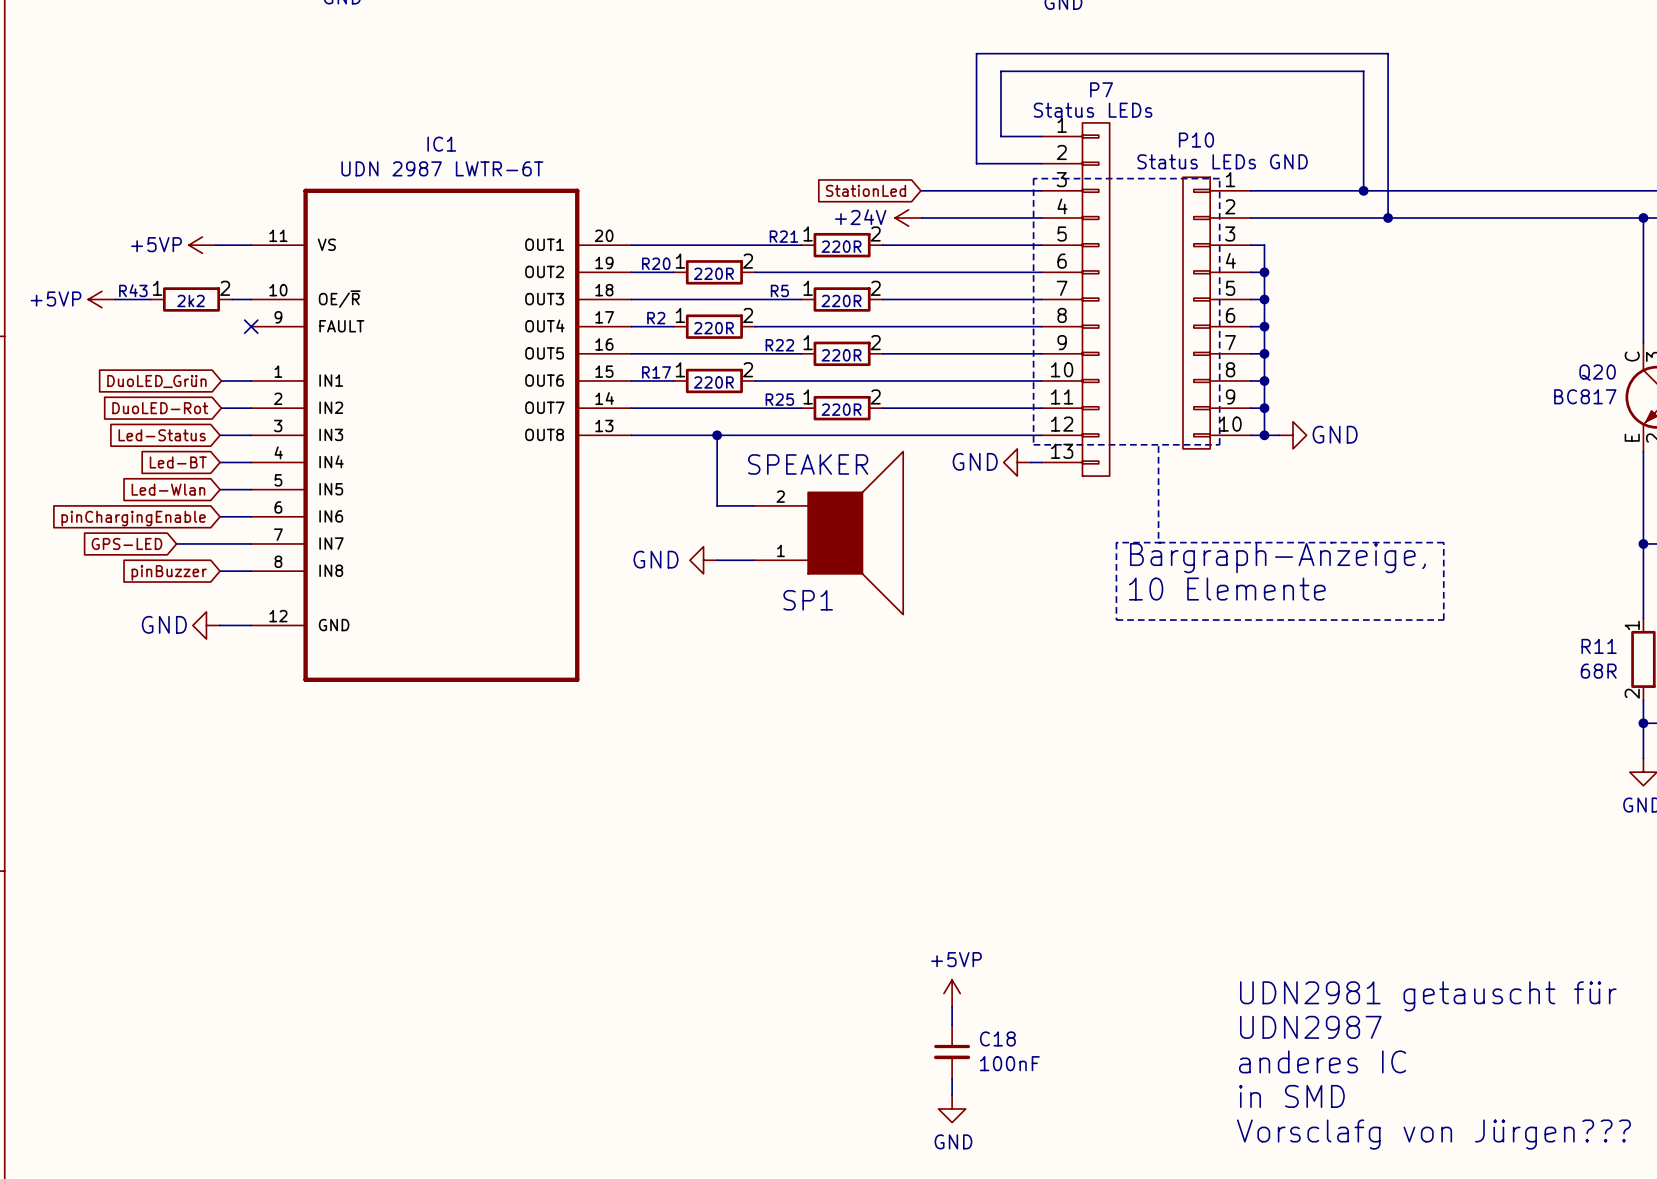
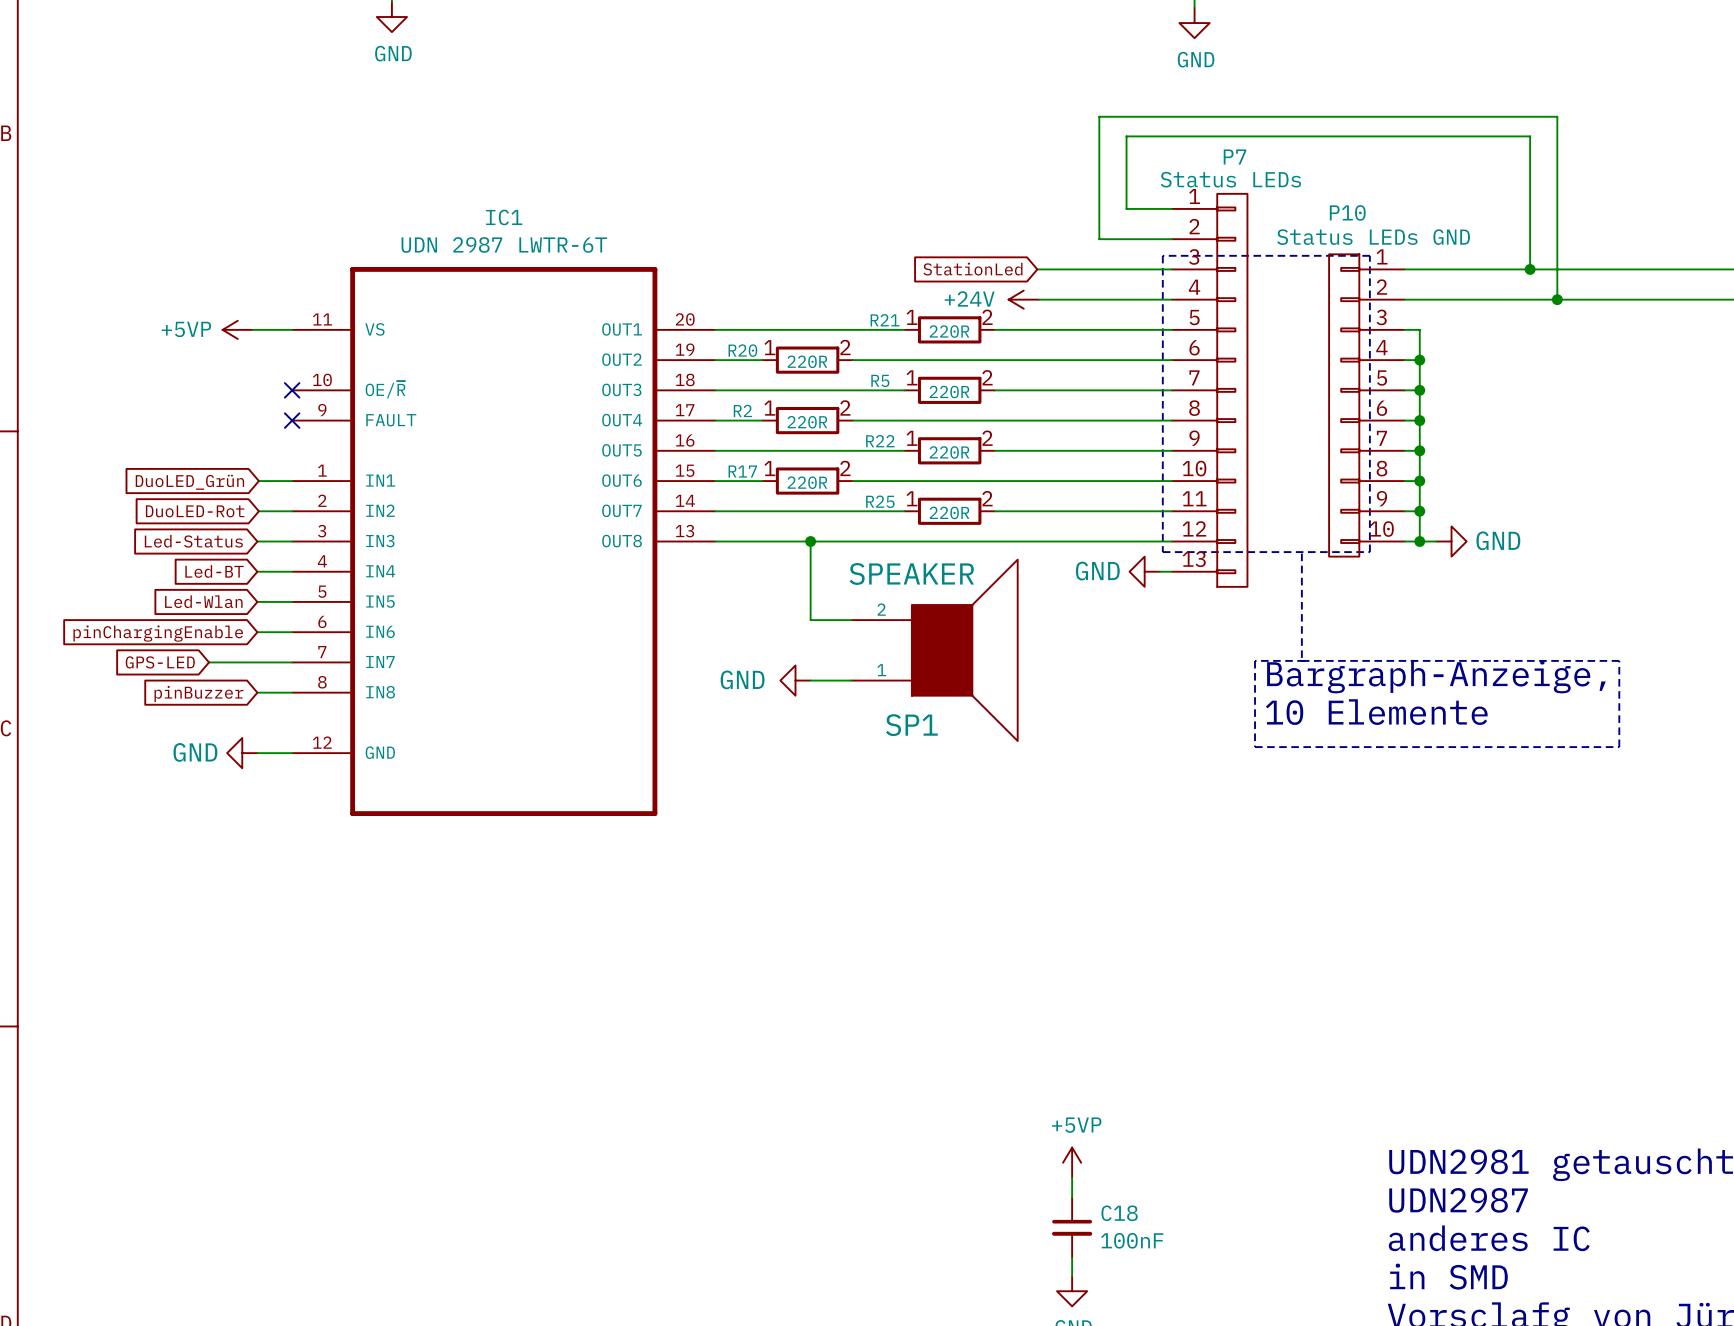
power symbol: +5VP (101, 299) -> none
wire: (115, 299) (150, 299) -> none
R43: 2k2 (191, 299) -> none
wire: (232, 299) (251, 299) -> none
no-connect mark: none -> (292, 390)

